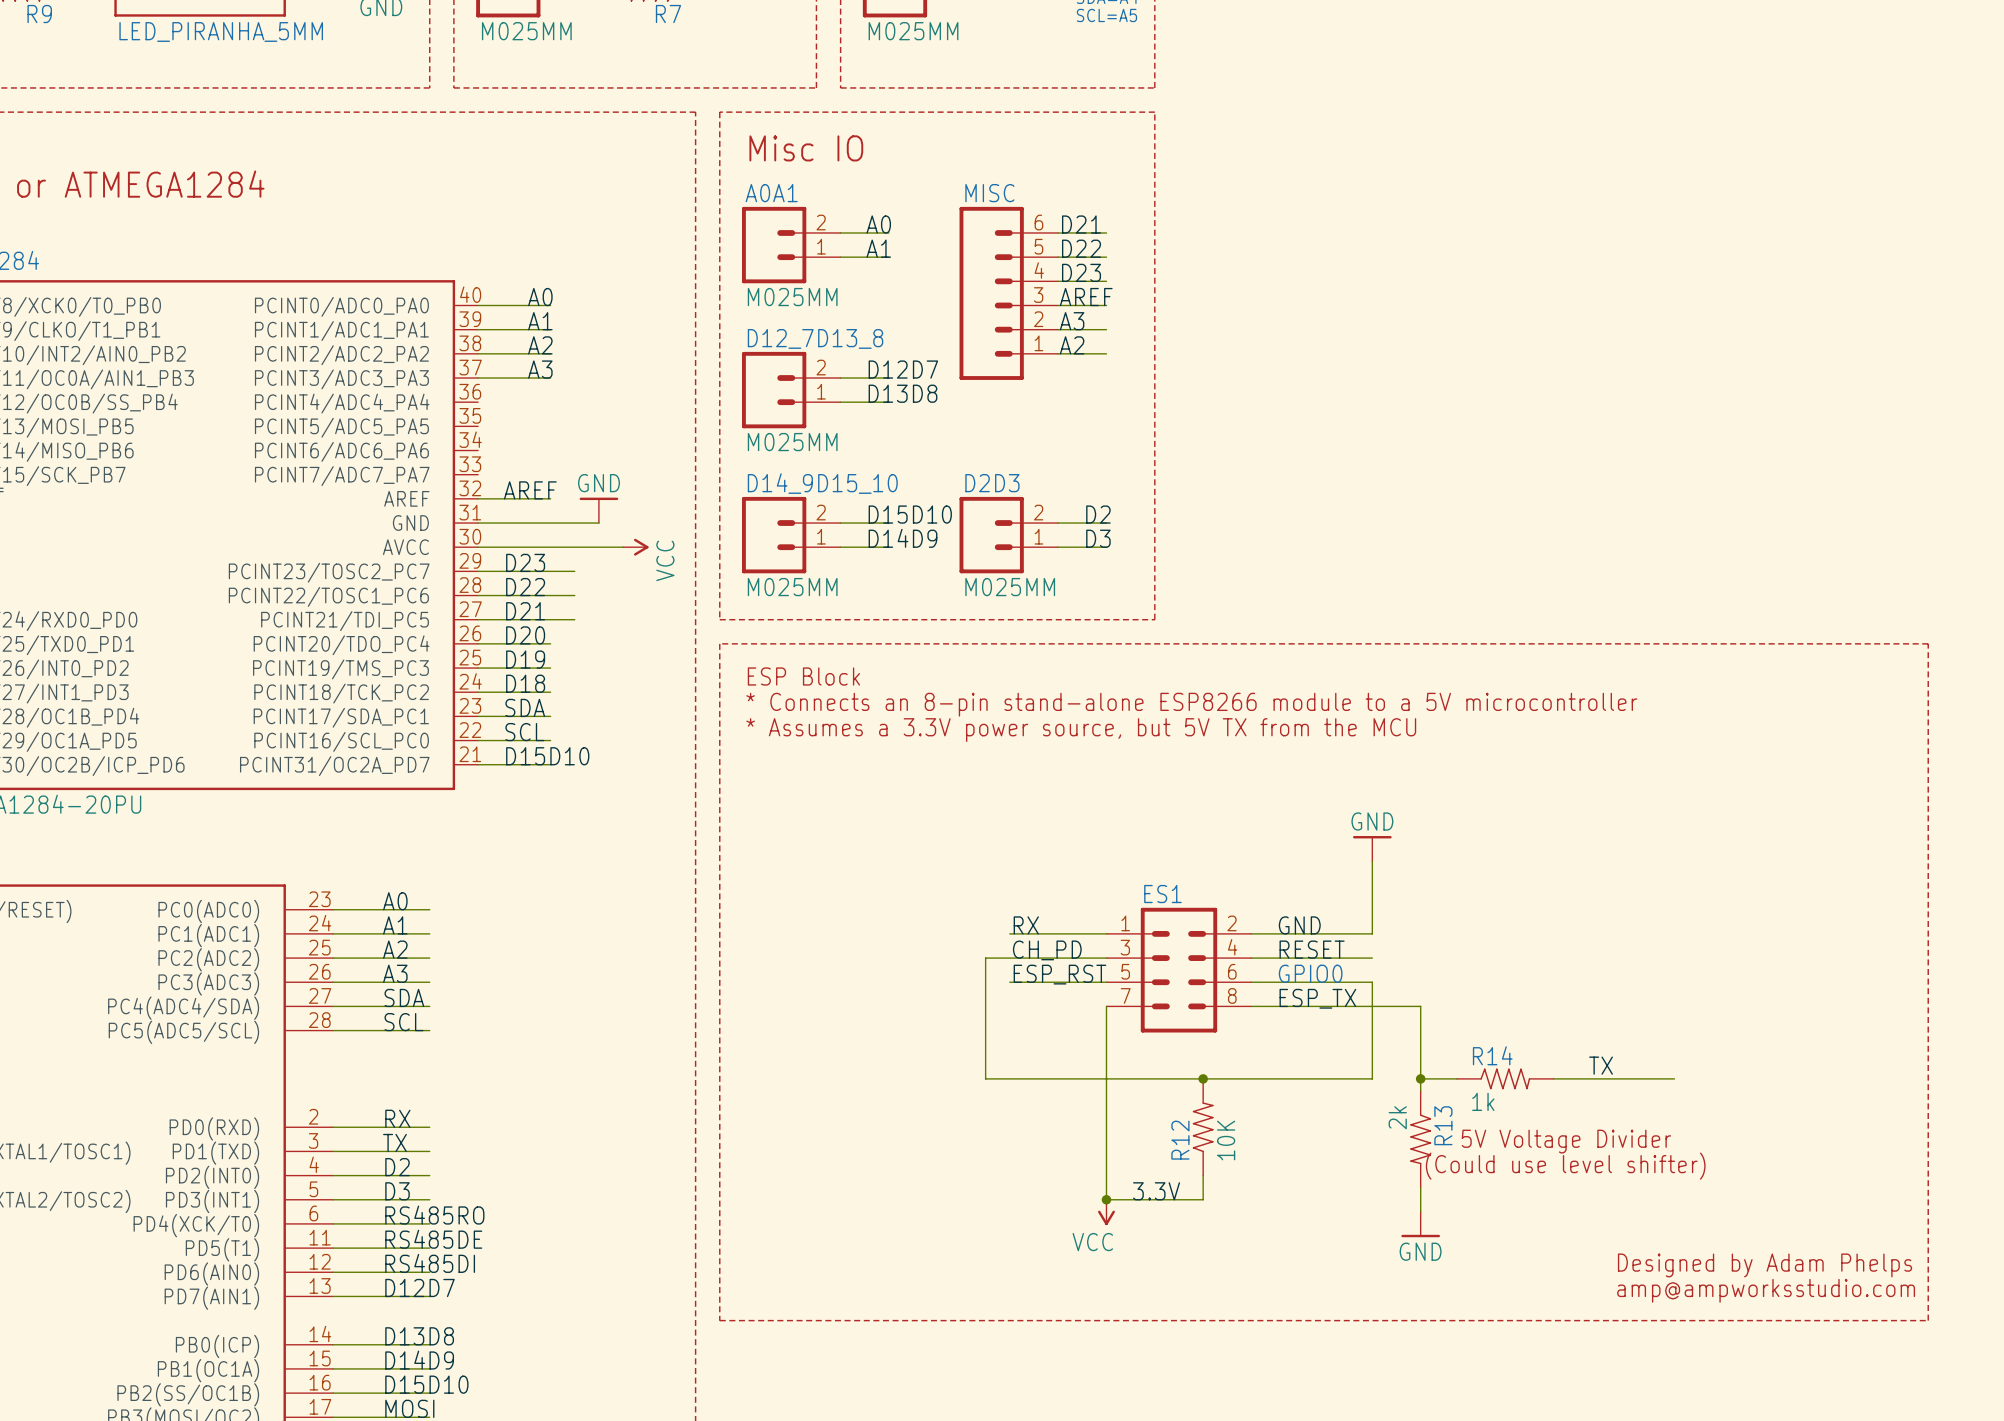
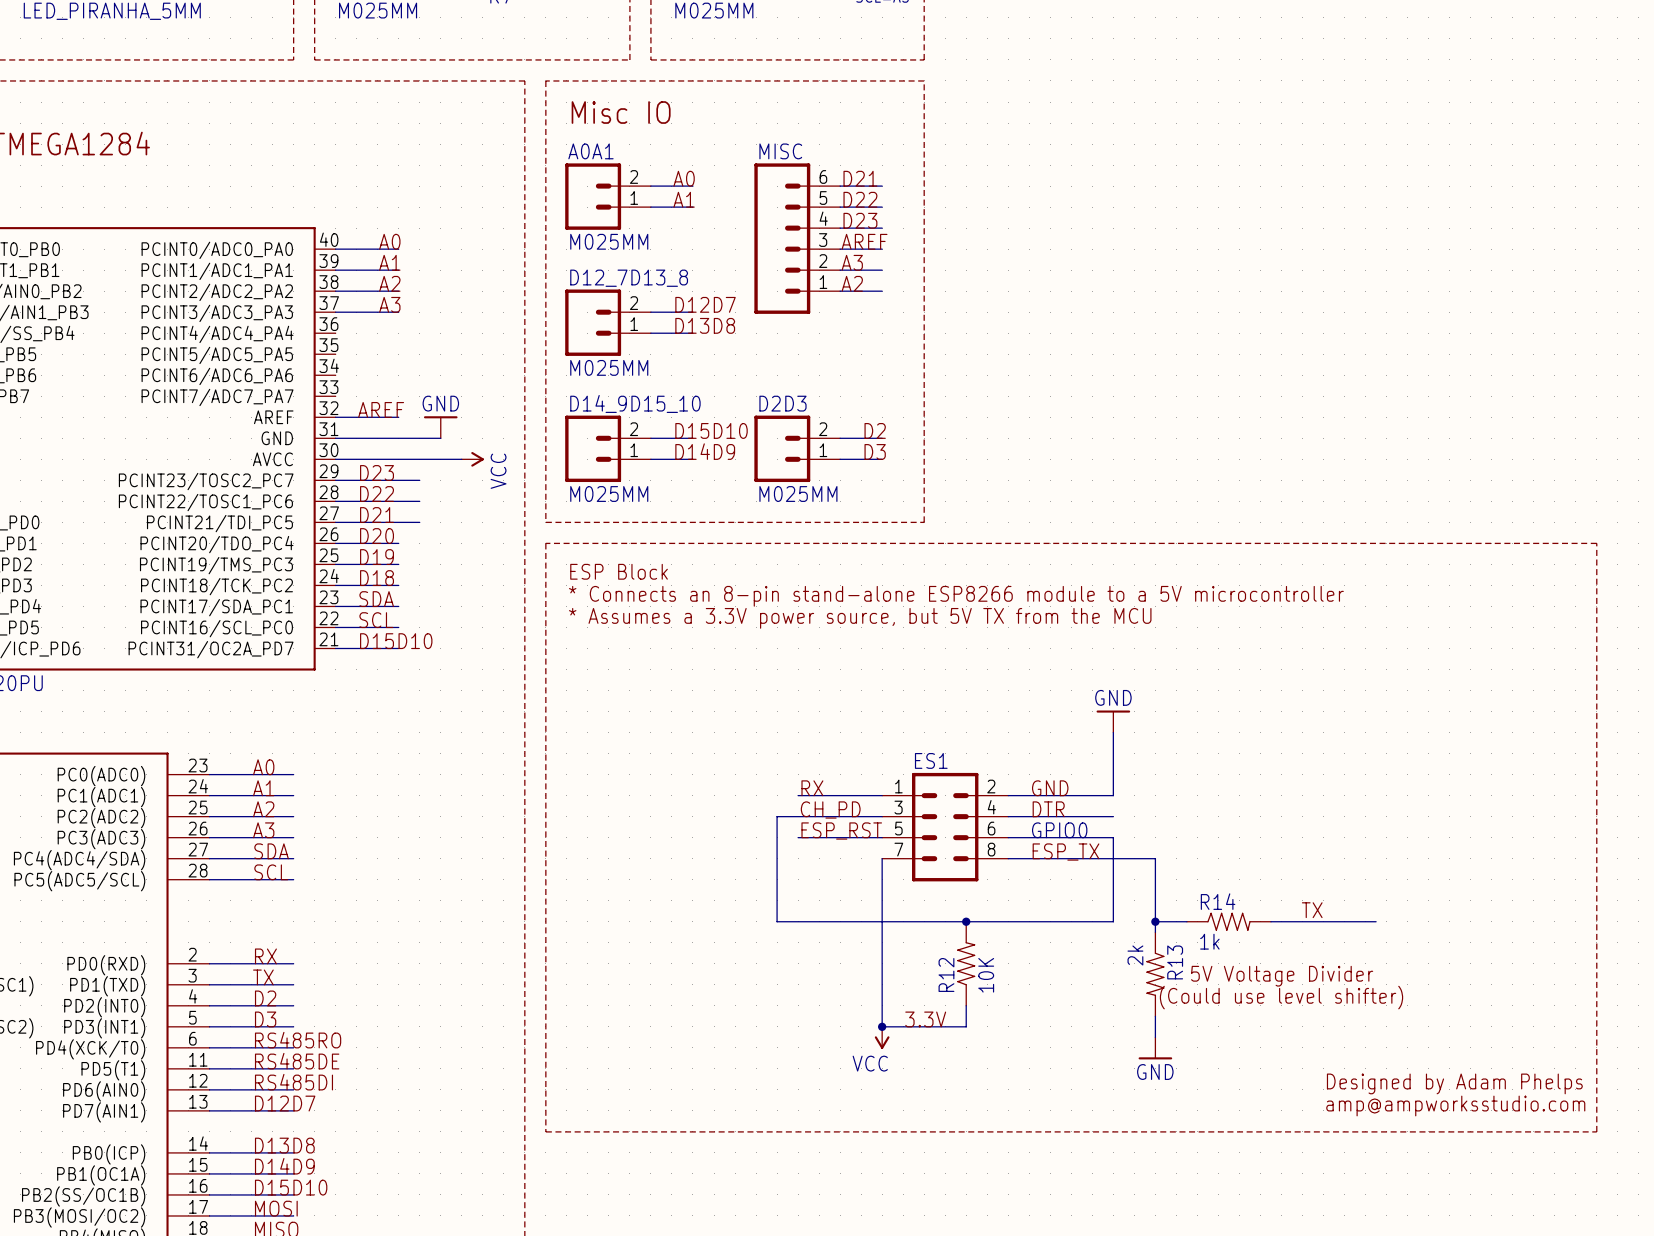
label: RESET (1312, 949) -> DTR (1048, 809)

